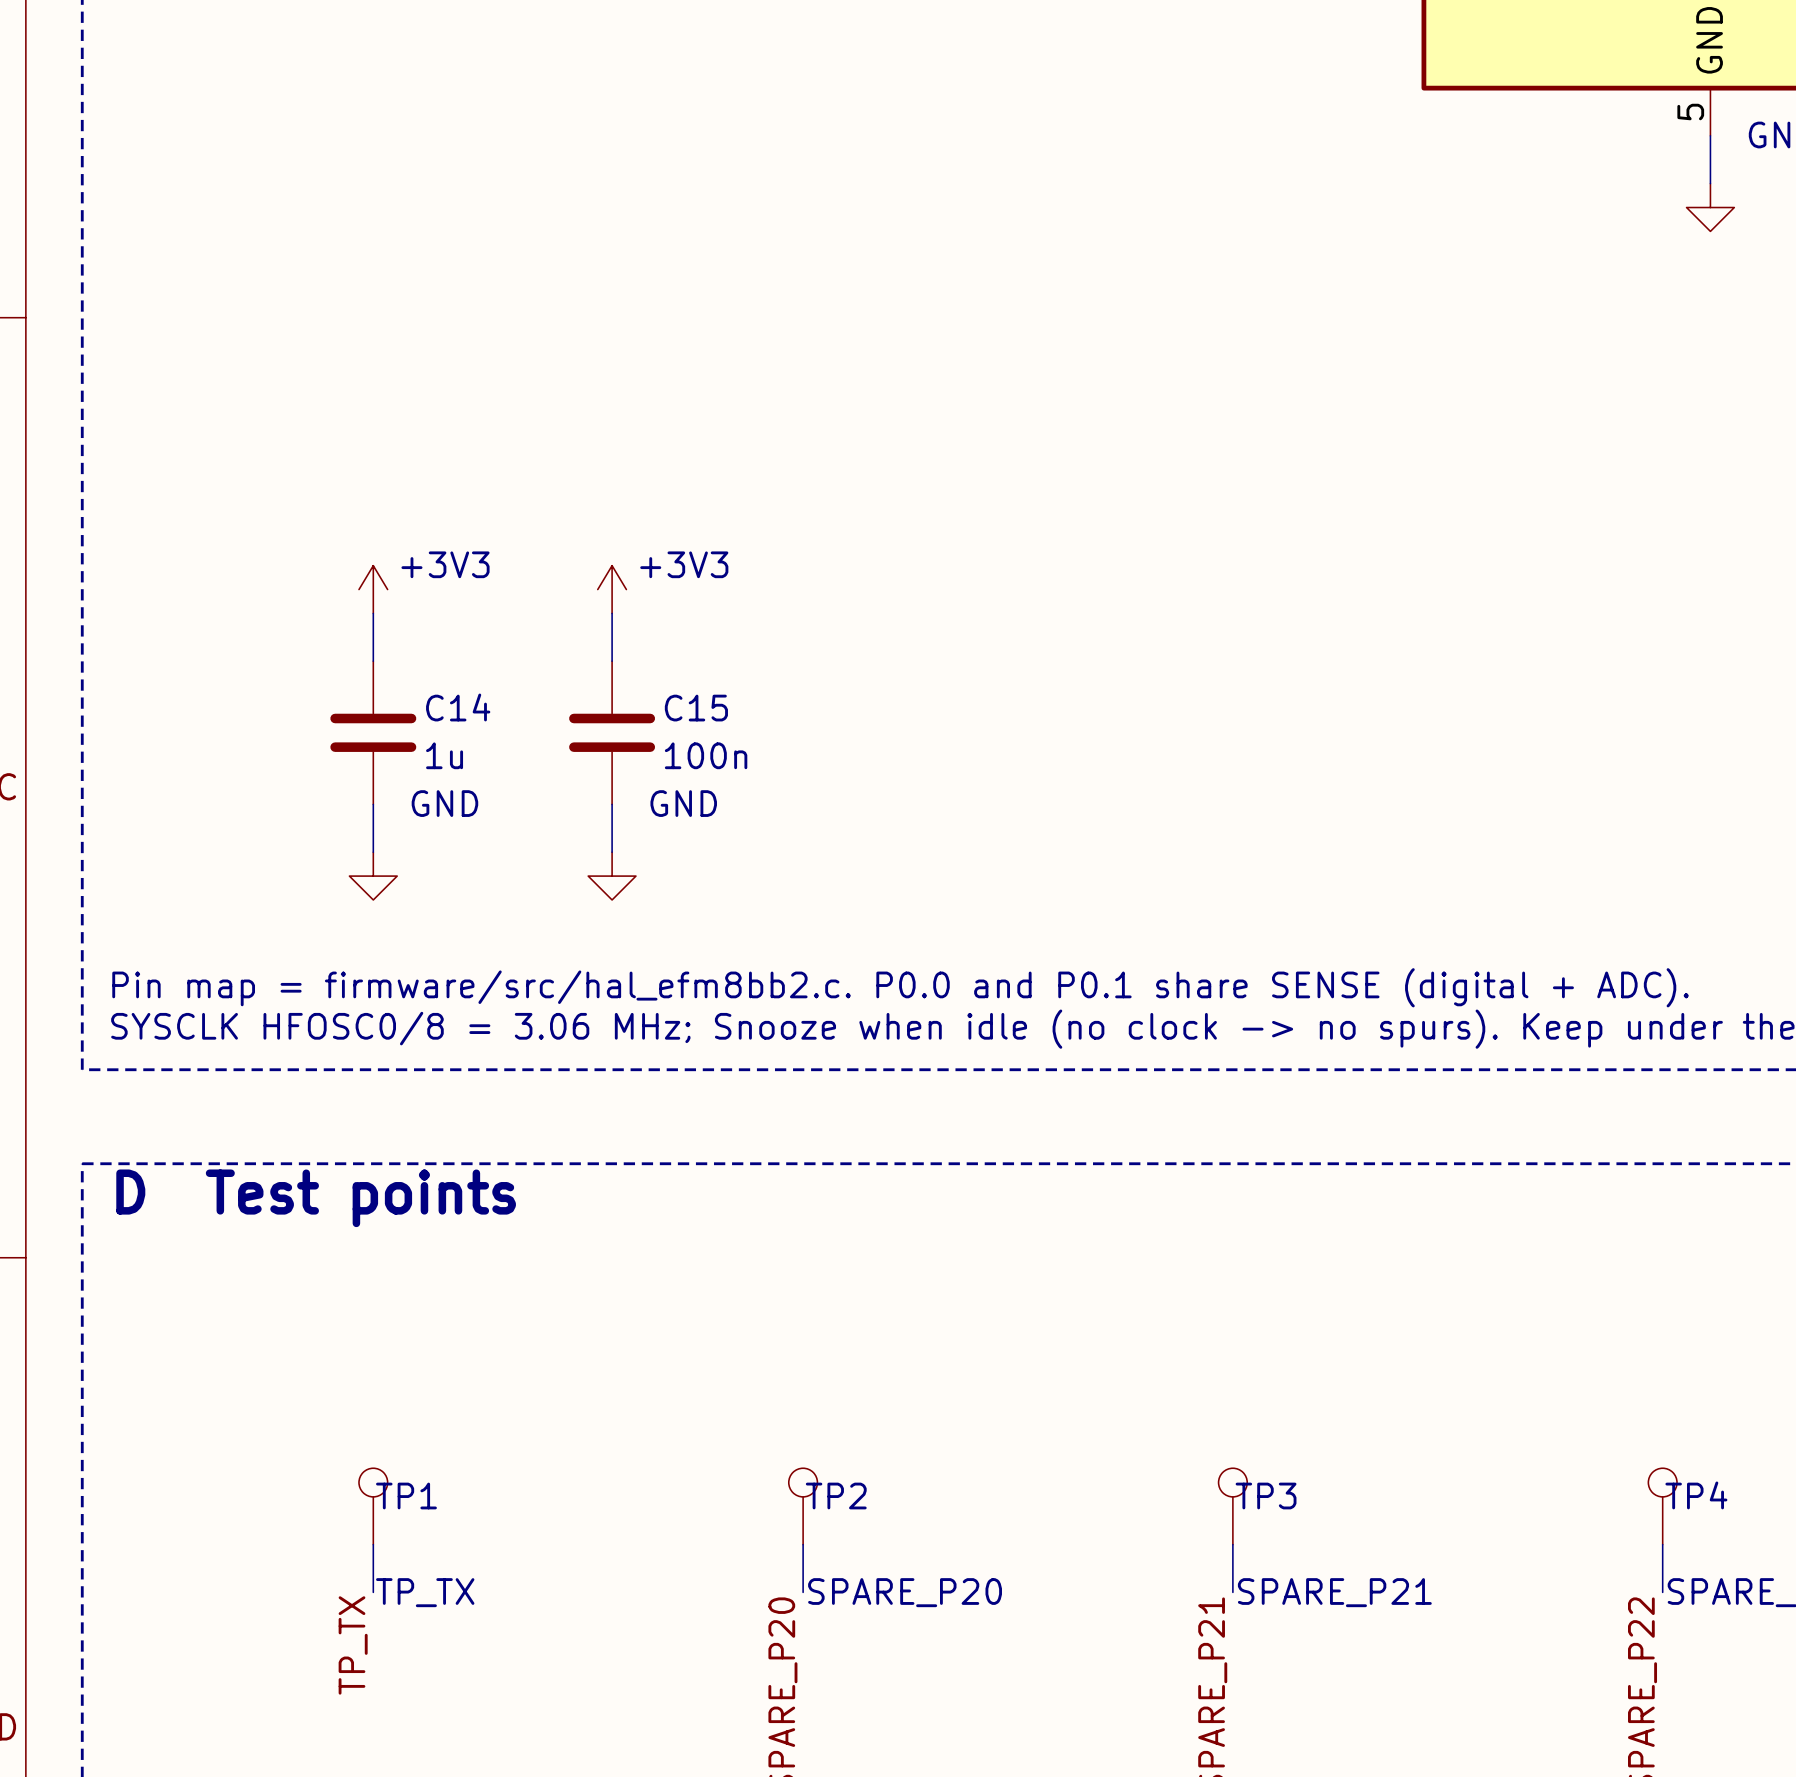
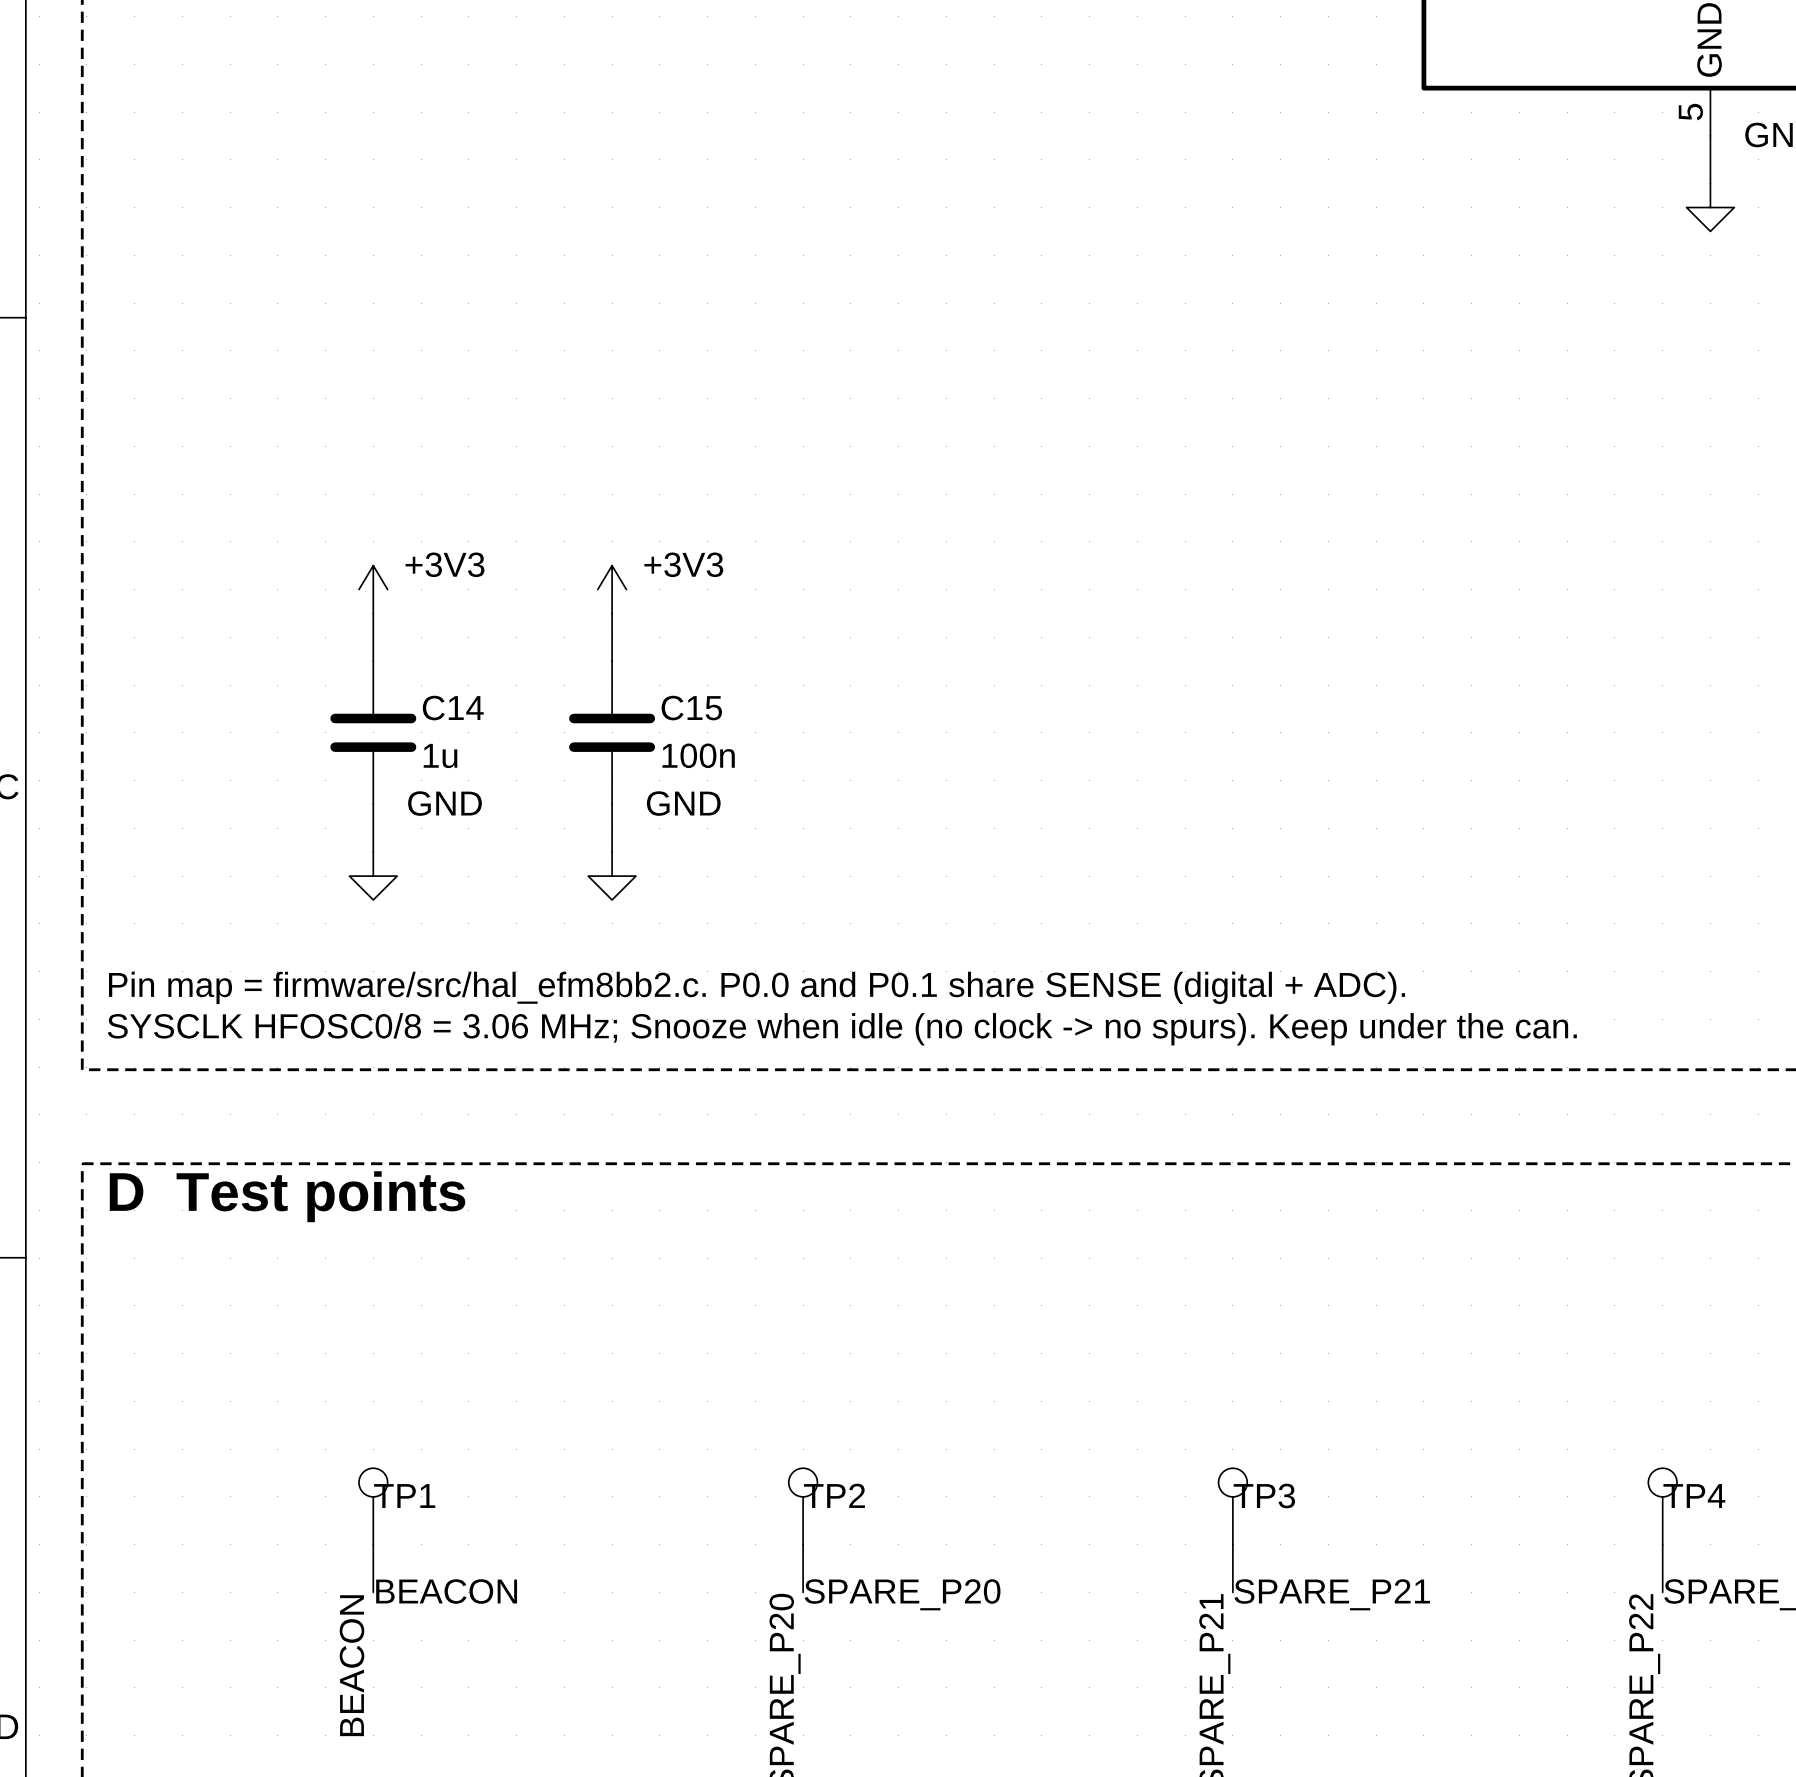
TP1 value: TP_TX (425, 1592) -> BEACON (446, 1591)
label: TP_TX (353, 1645) -> BEACON (351, 1665)

